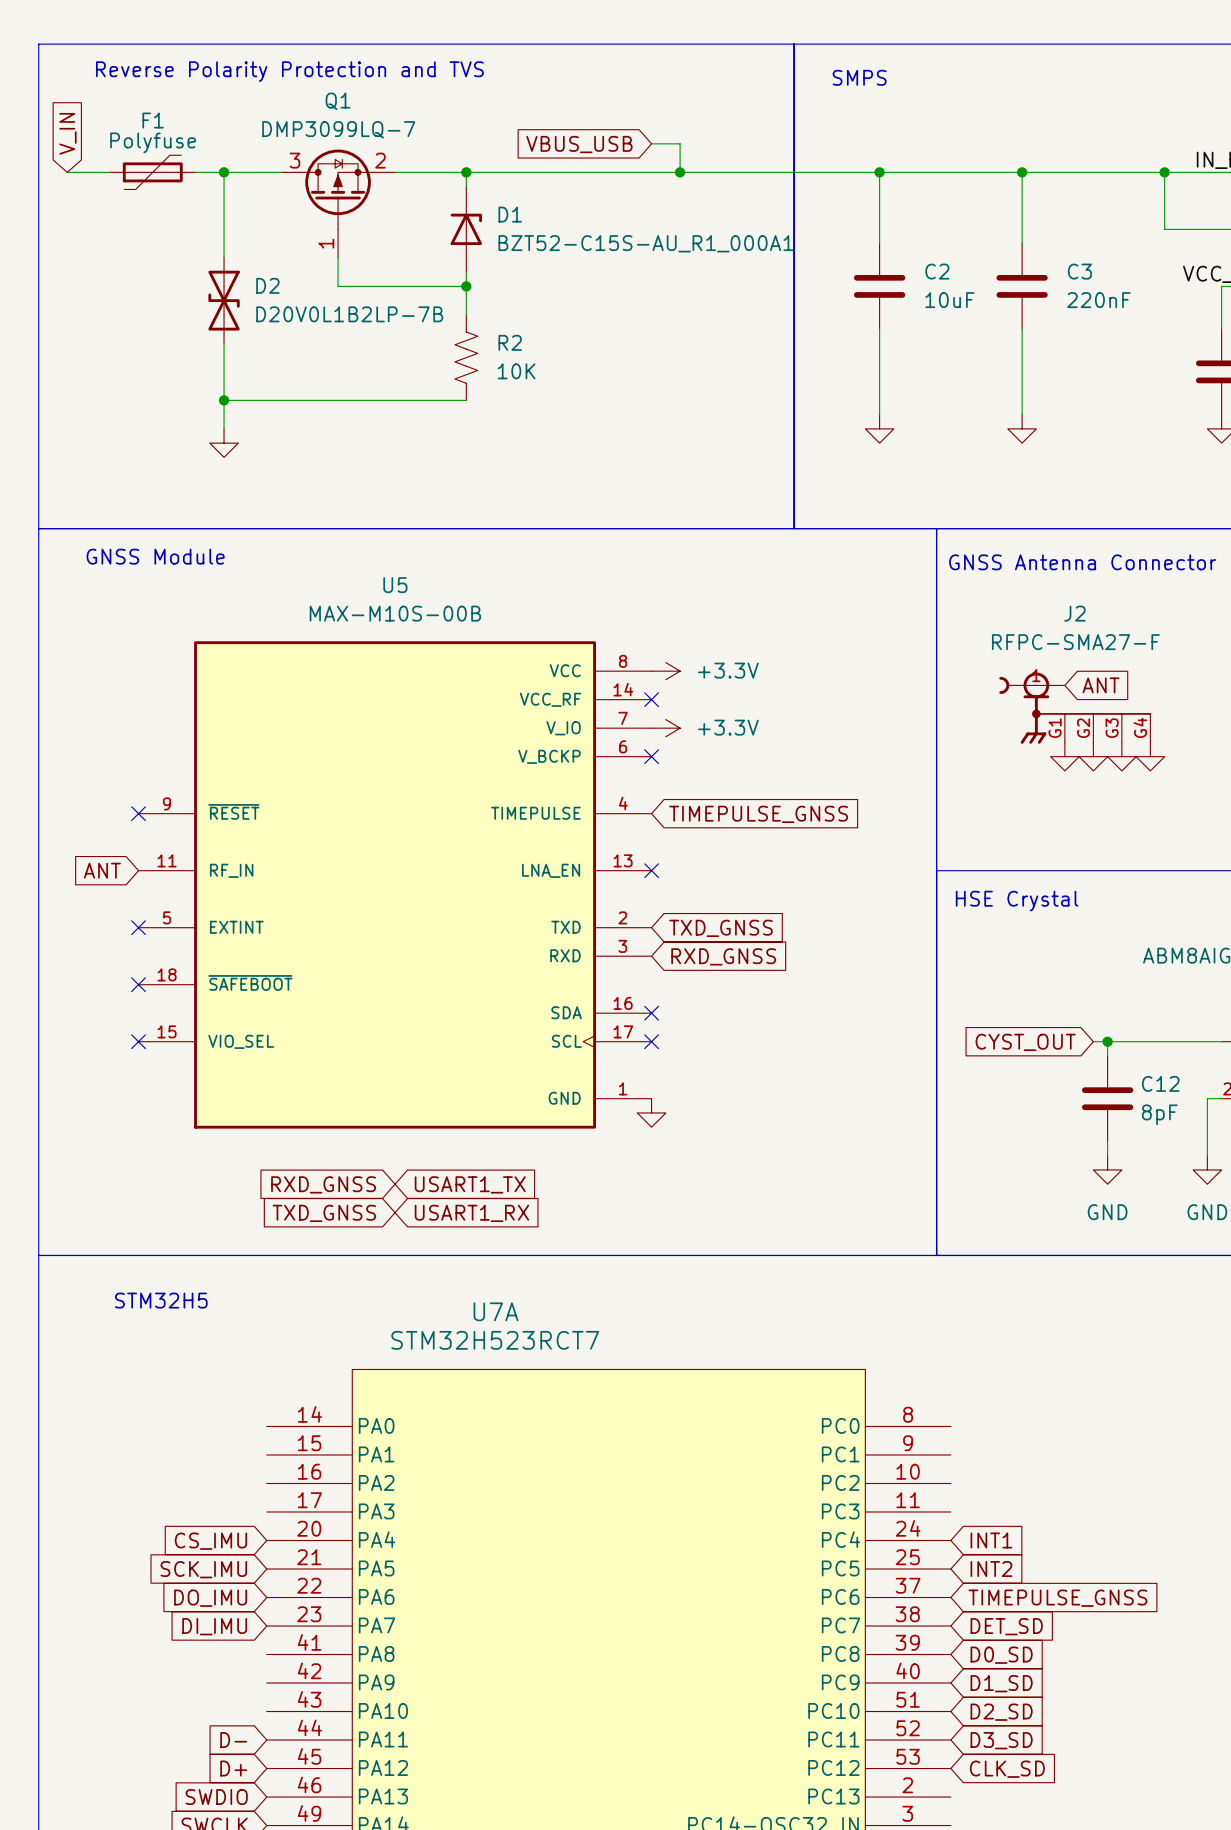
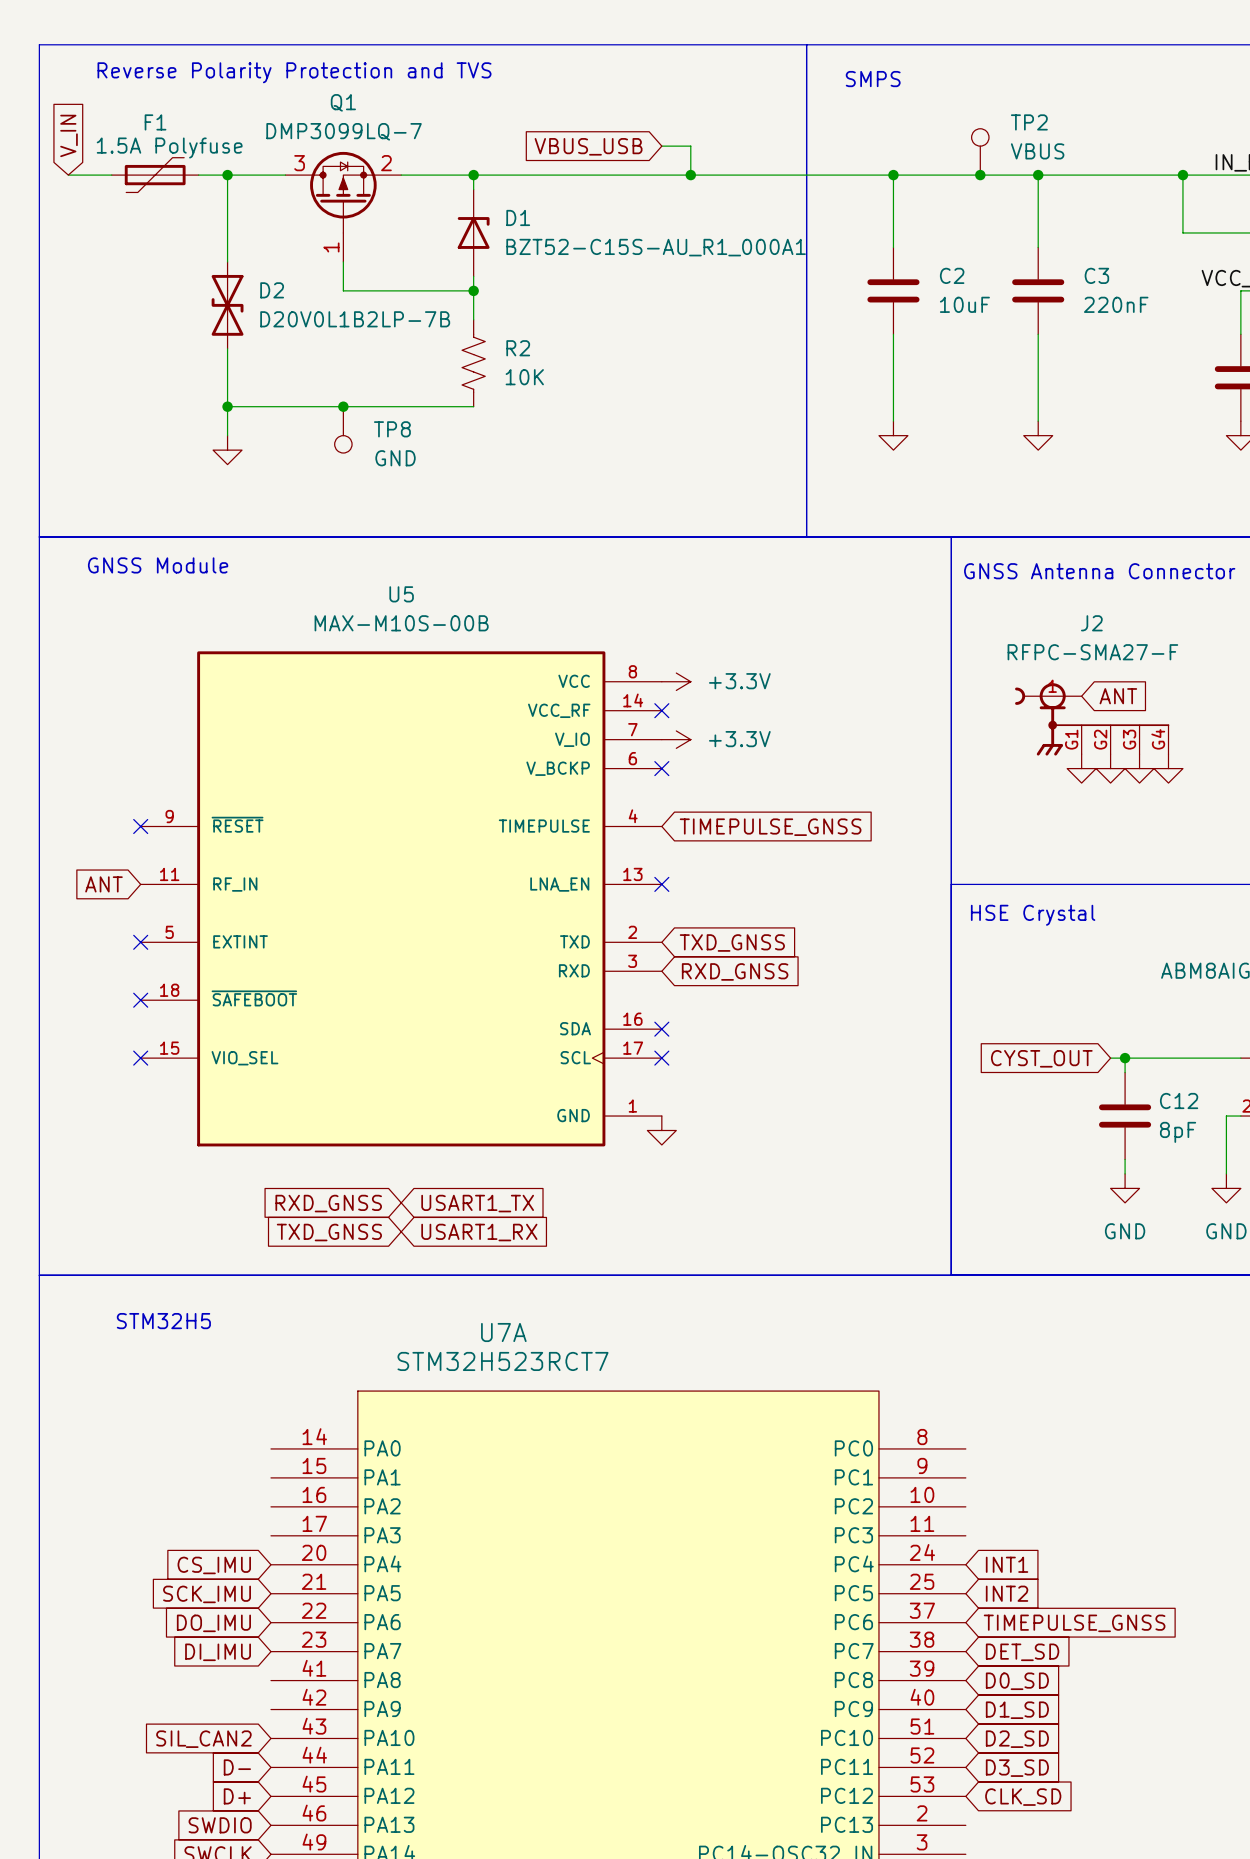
F1 value: Polyfuse (153, 142) -> 1.5A Polyfuse (169, 148)
TP2: none -> VBUS (980, 151)
junction: none -> (980, 175)
junction: none -> (343, 406)
TP8: none -> GND (343, 429)
global label: none -> SIL_CAN2 (203, 1739)

